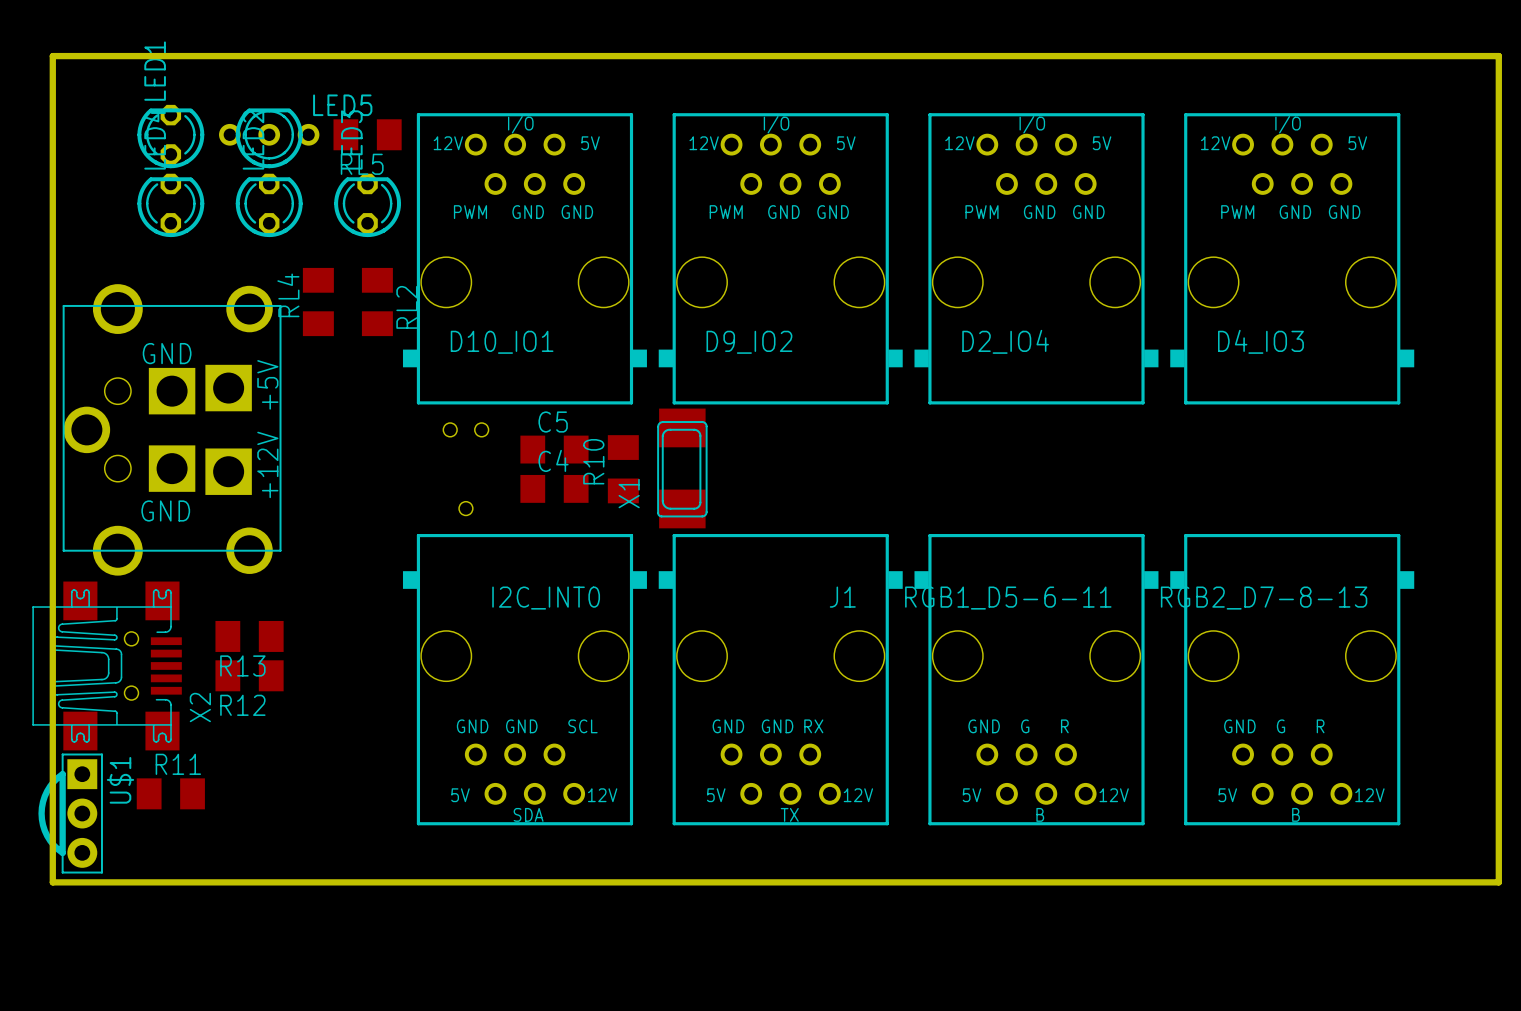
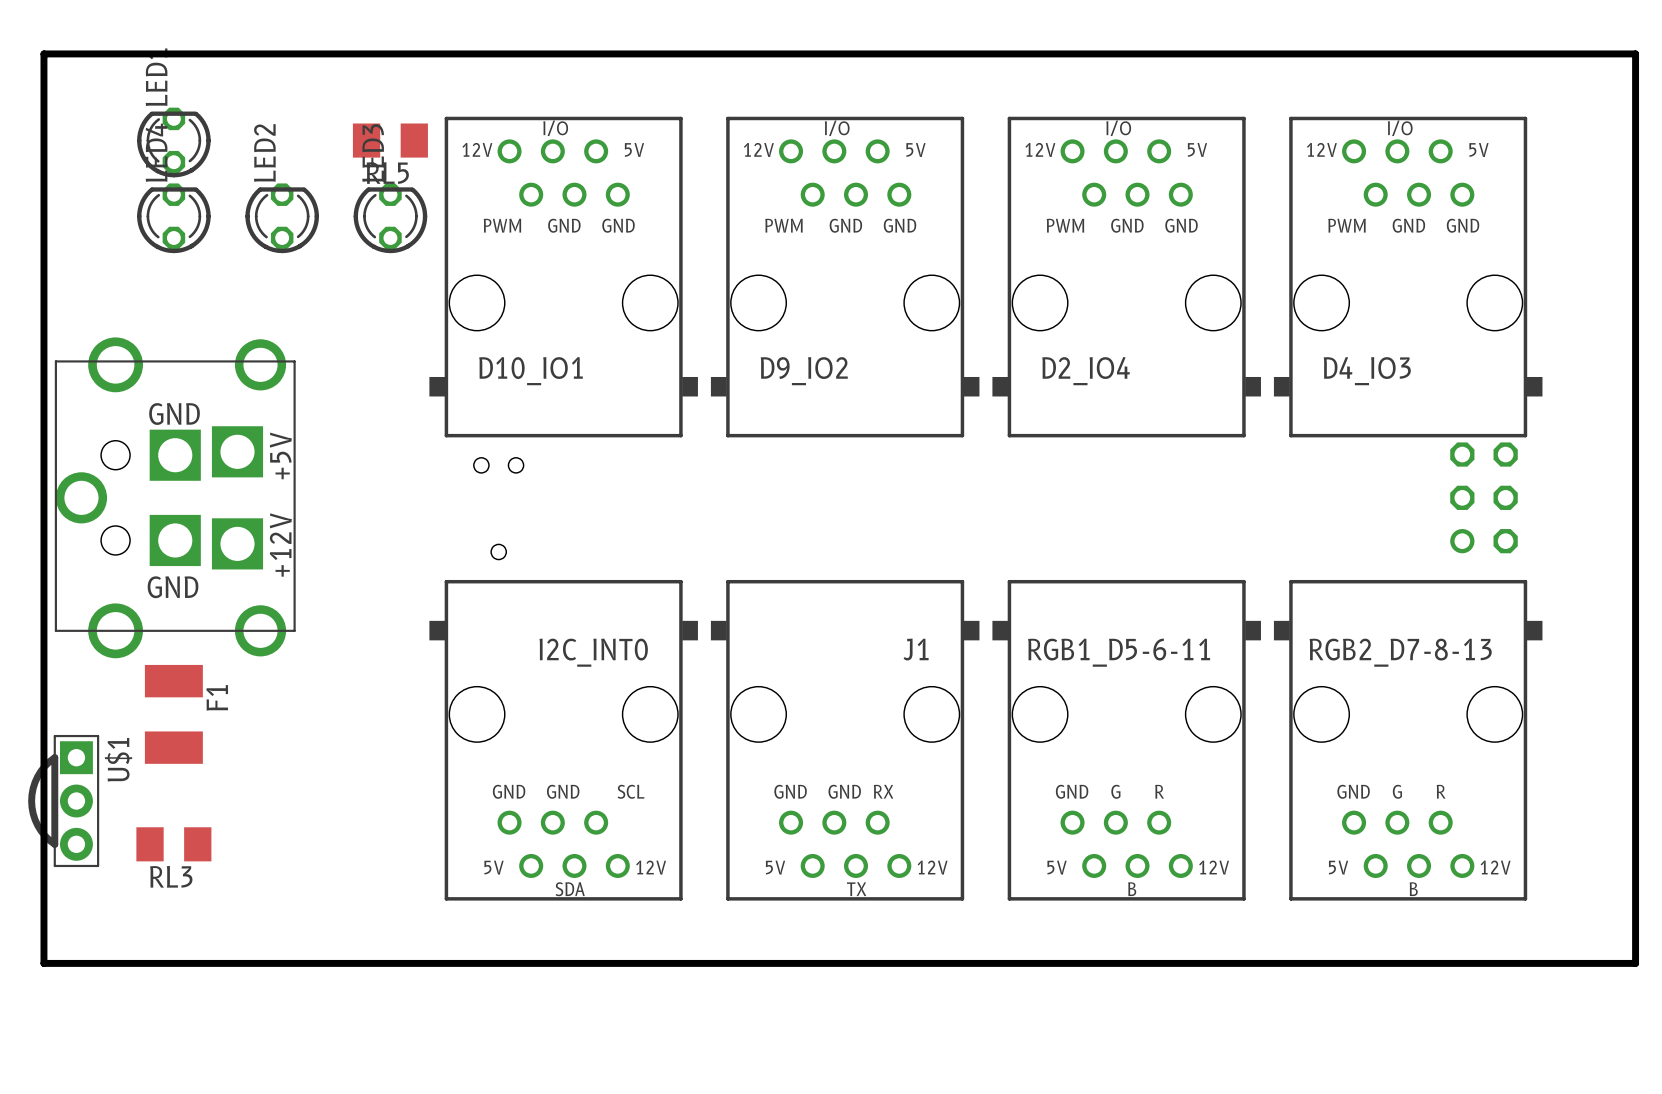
LED5: (269, 138) -> none
RL4: (318, 302) -> none
RL2: (377, 302) -> none
part position: (172, 429) -> (175, 497)
C5: (554, 449) -> none
part: none -> (1483, 497)
X1: (682, 468) -> none
R10: (623, 469) -> none
C4: (554, 488) -> none
R13: (249, 636) -> none
F1: none -> (173, 714)
X2: (107, 665) -> none
R12: (249, 675) -> none
RL3: none -> (173, 844)
R11: (170, 793) -> none
U$1 position: (70, 813) -> (63, 801)

